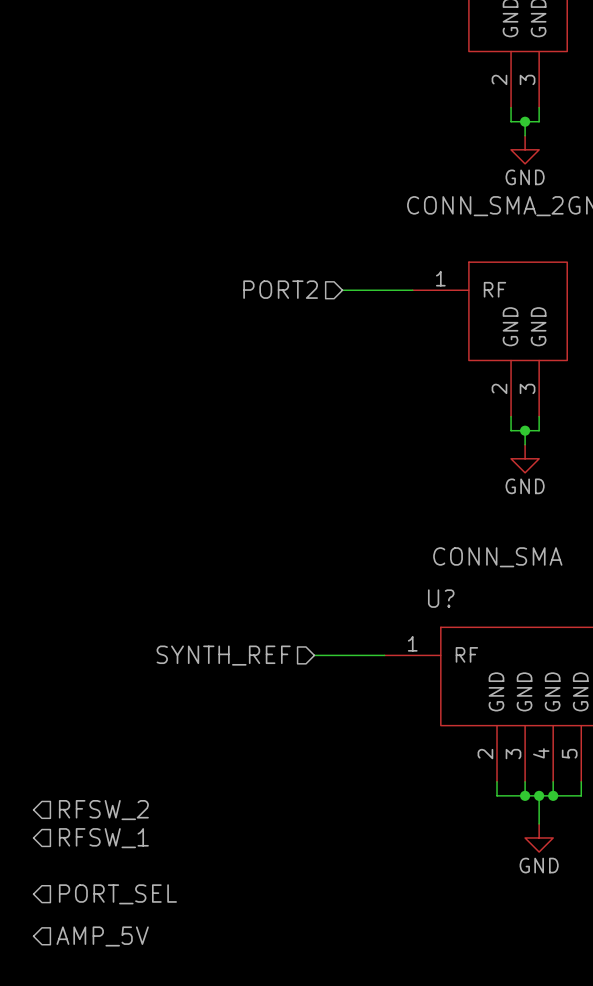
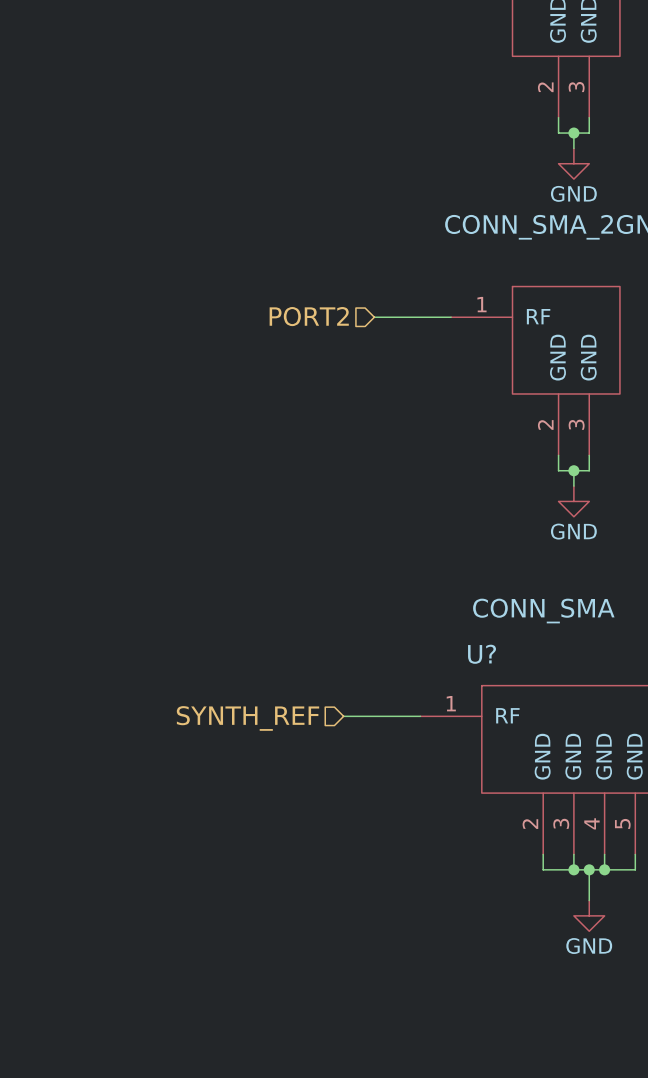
hierarchical label: RFSW_2 (103, 810) -> none
hierarchical label: RFSW_1 (103, 838) -> none
hierarchical label: PORT_SEL (117, 894) -> none
hierarchical label: AMP_5V (102, 936) -> none

